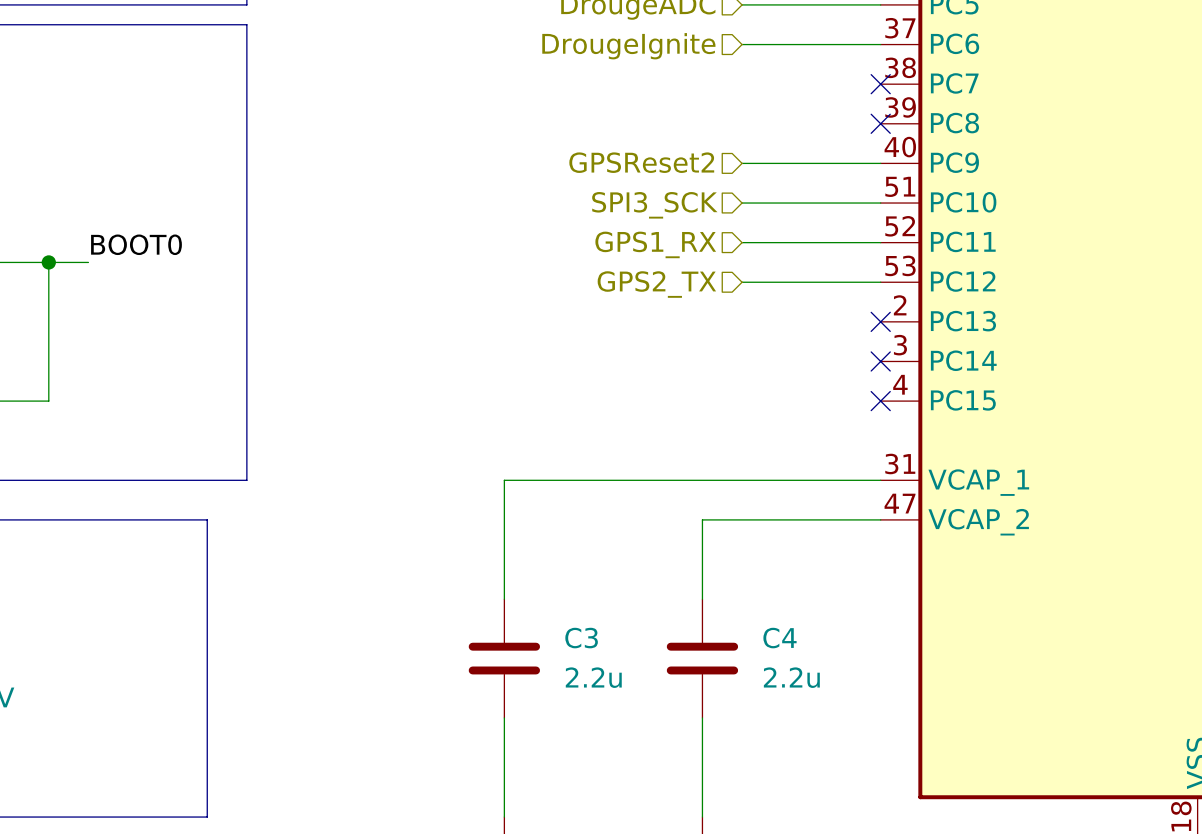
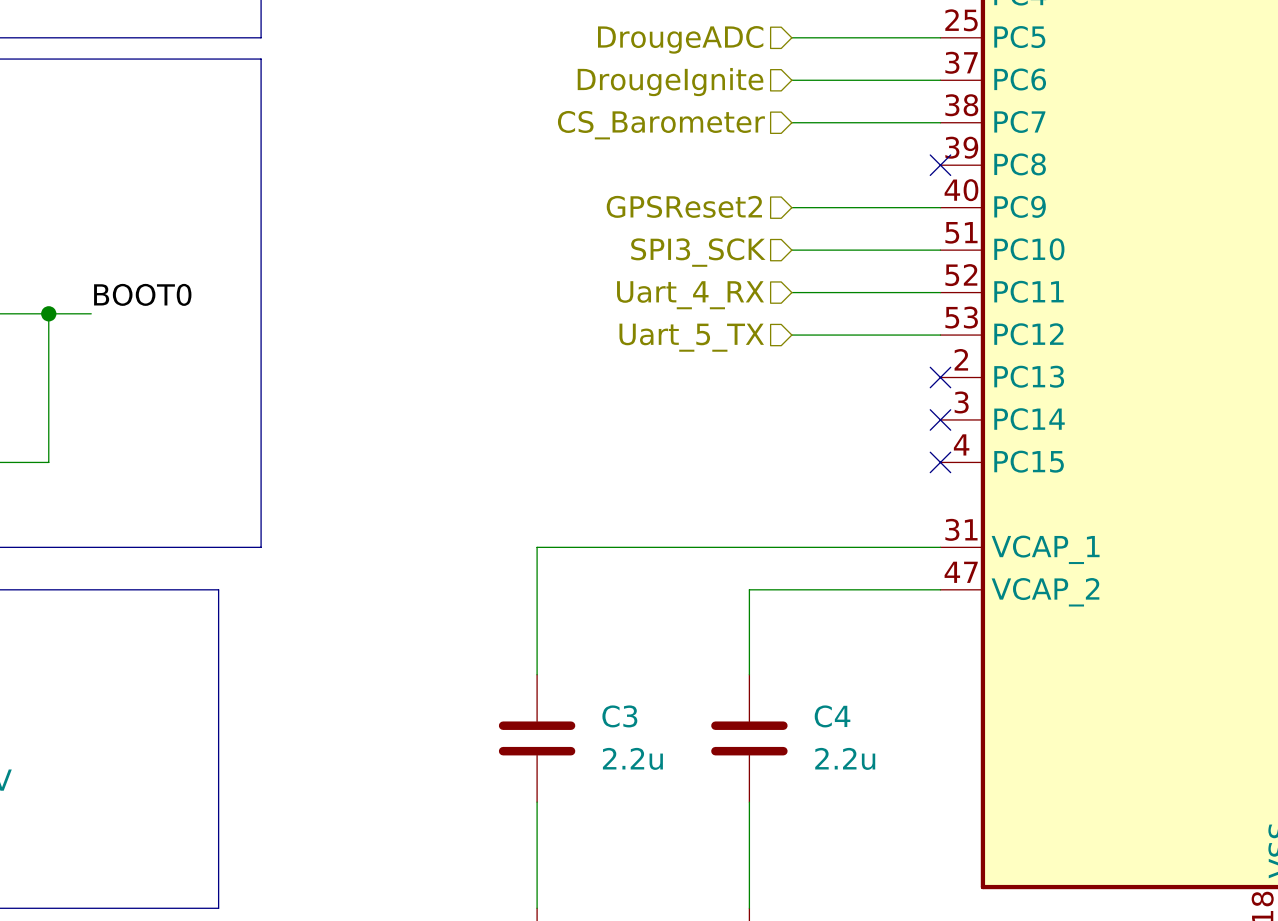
wire: none -> (791, 122) (940, 122)
no-connect mark: (880, 84) -> none
hierarchical label: none -> CS_Barometer (661, 125)
hierarchical label: GPS1_RX (655, 244) -> Uart_4_RX (690, 295)
hierarchical label: GPS2_TX (656, 284) -> Uart_5_TX (691, 337)

